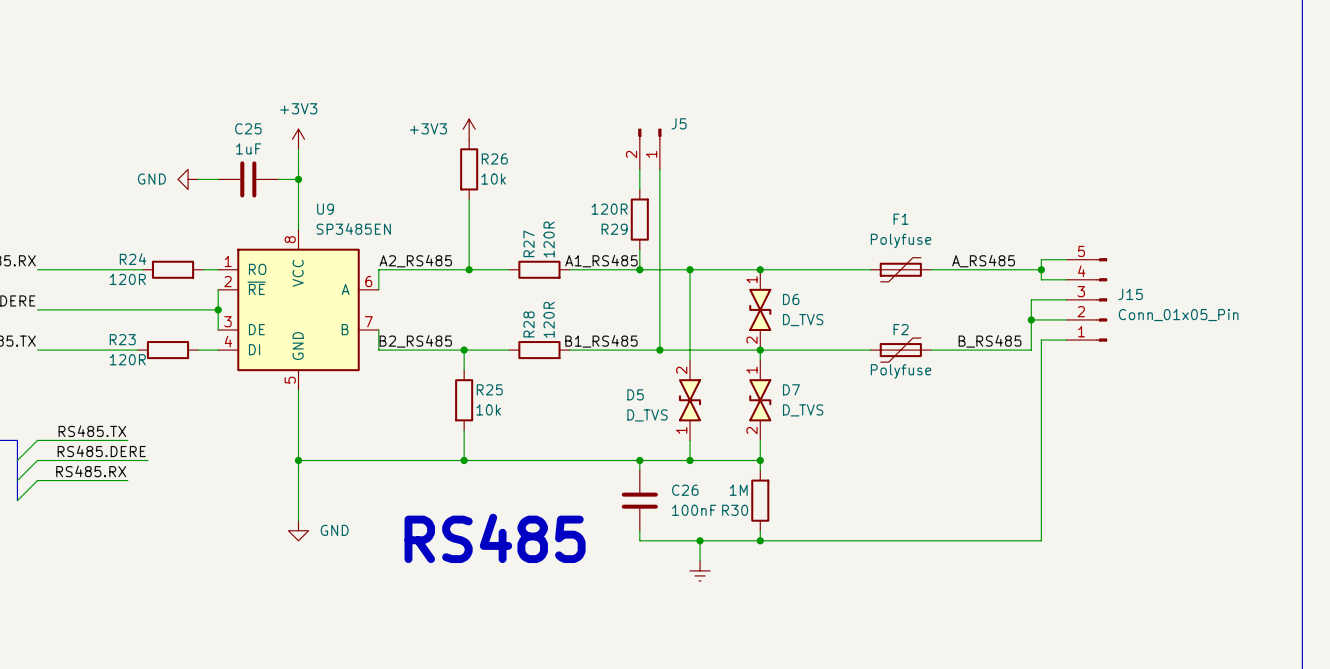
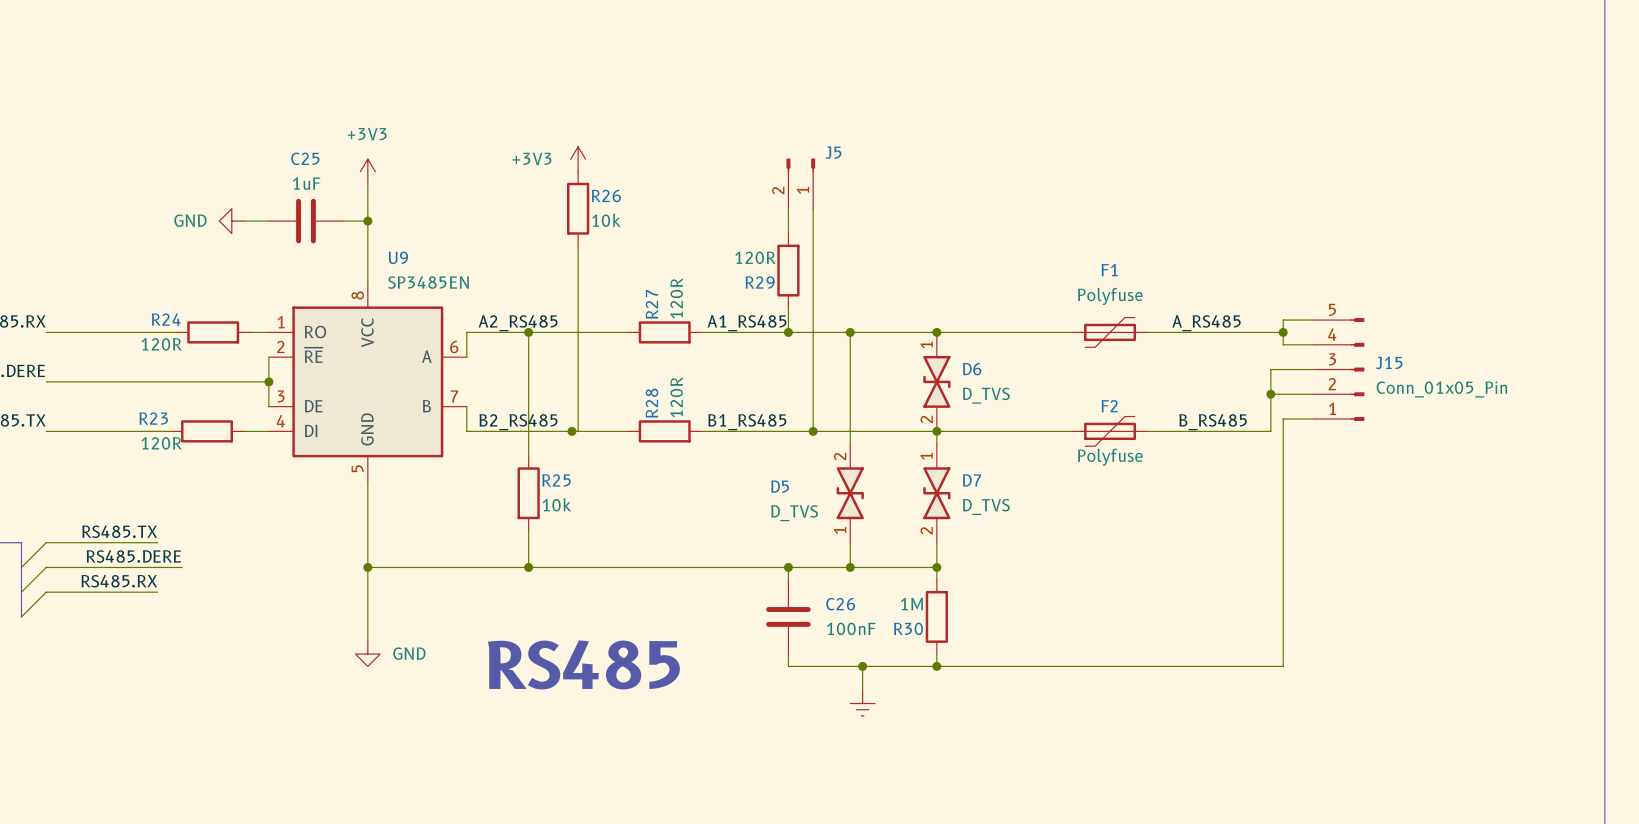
wire: none -> (528, 332) (528, 456)
wire: none -> (578, 332) (578, 431)
junction position: (469, 269) -> (528, 332)
wire: (464, 350) (464, 370) -> none
R25 position: (464, 400) -> (528, 493)
wire: (464, 430) (464, 460) -> (528, 530) (528, 567)
junction position: (464, 460) -> (528, 567)

